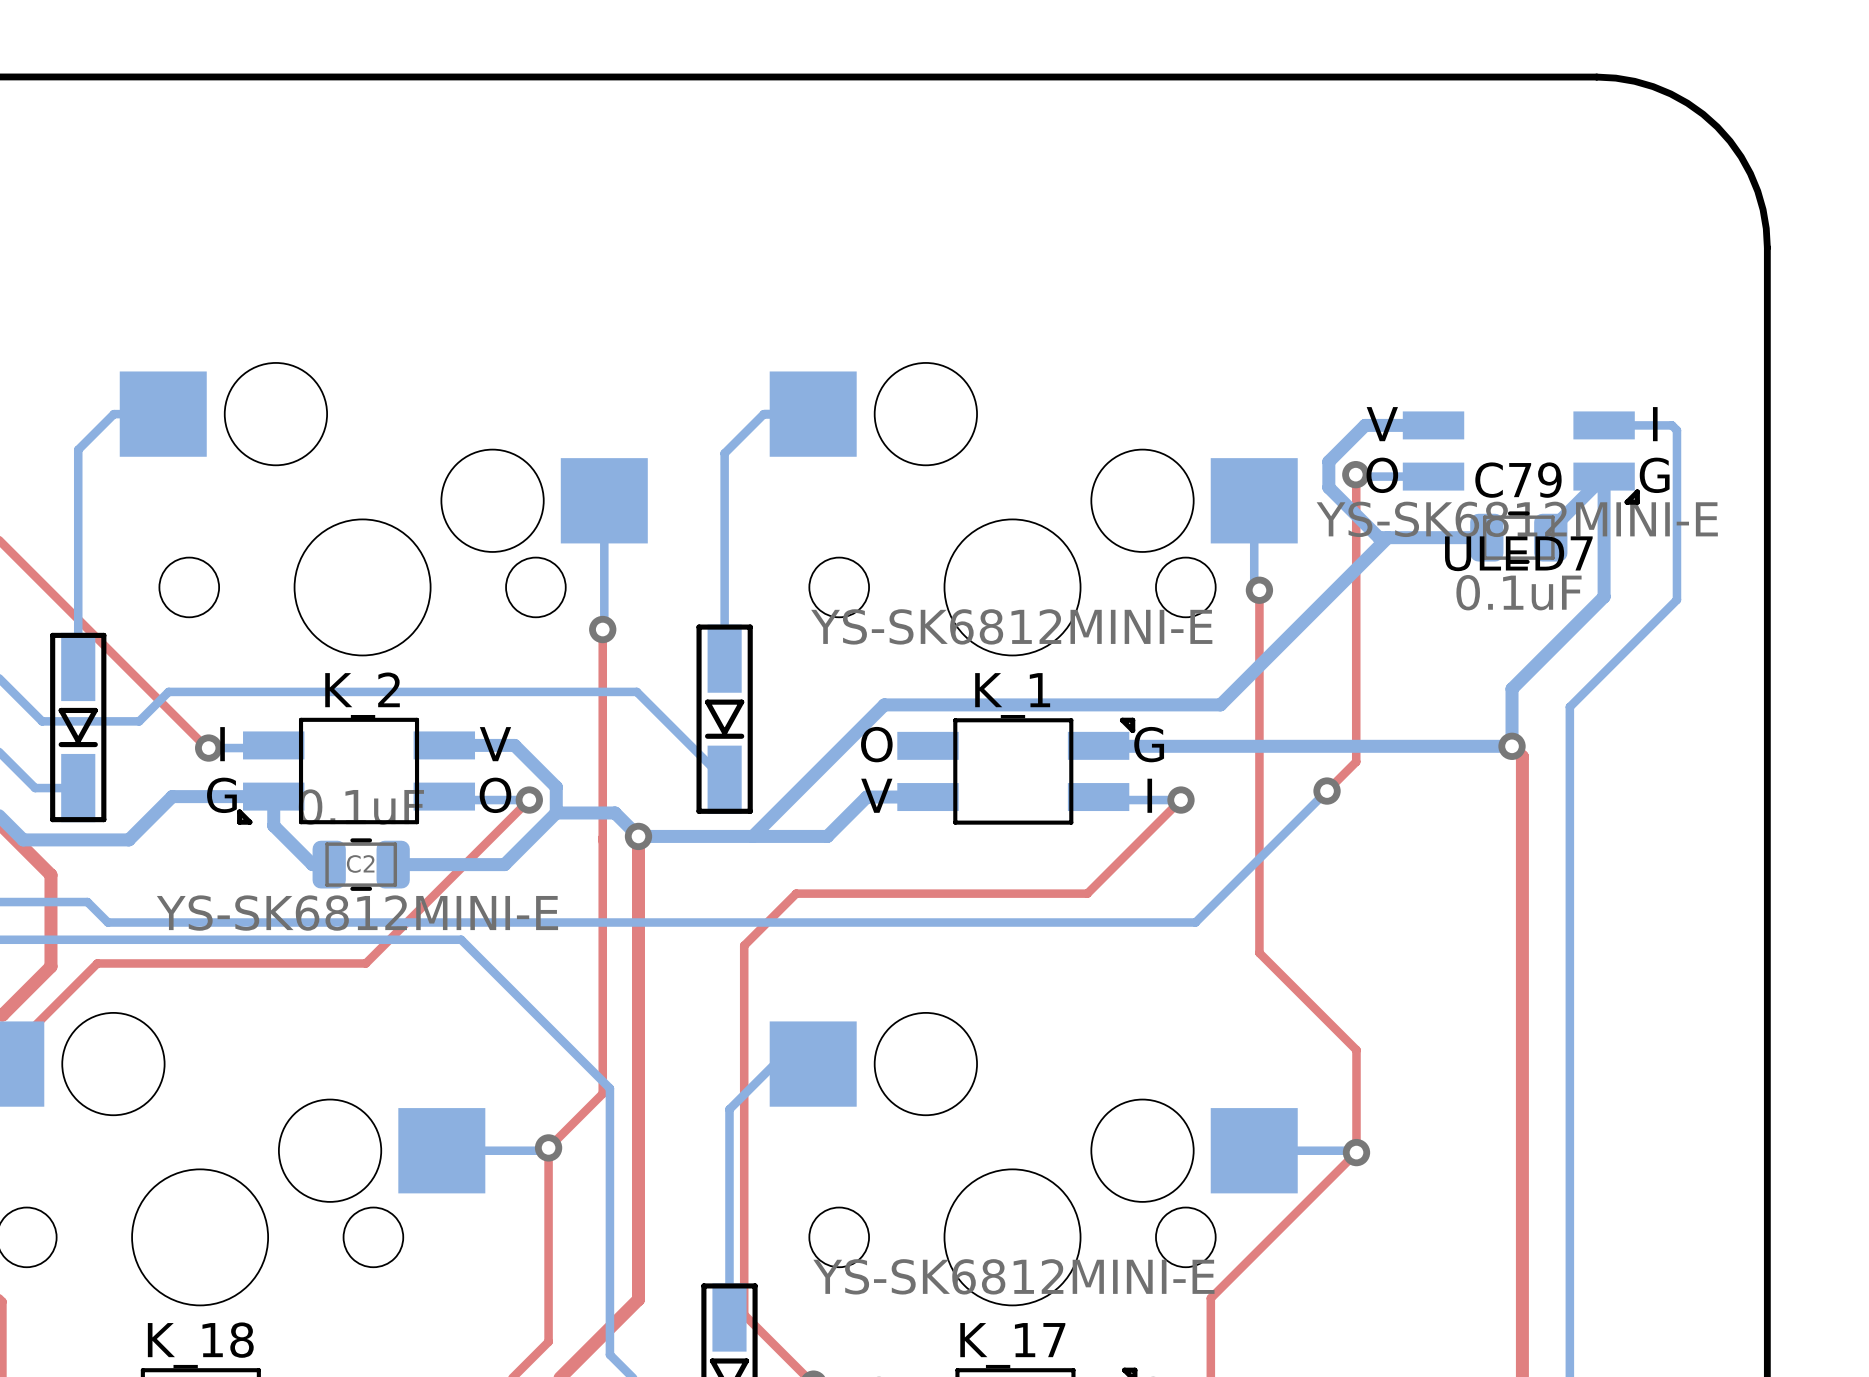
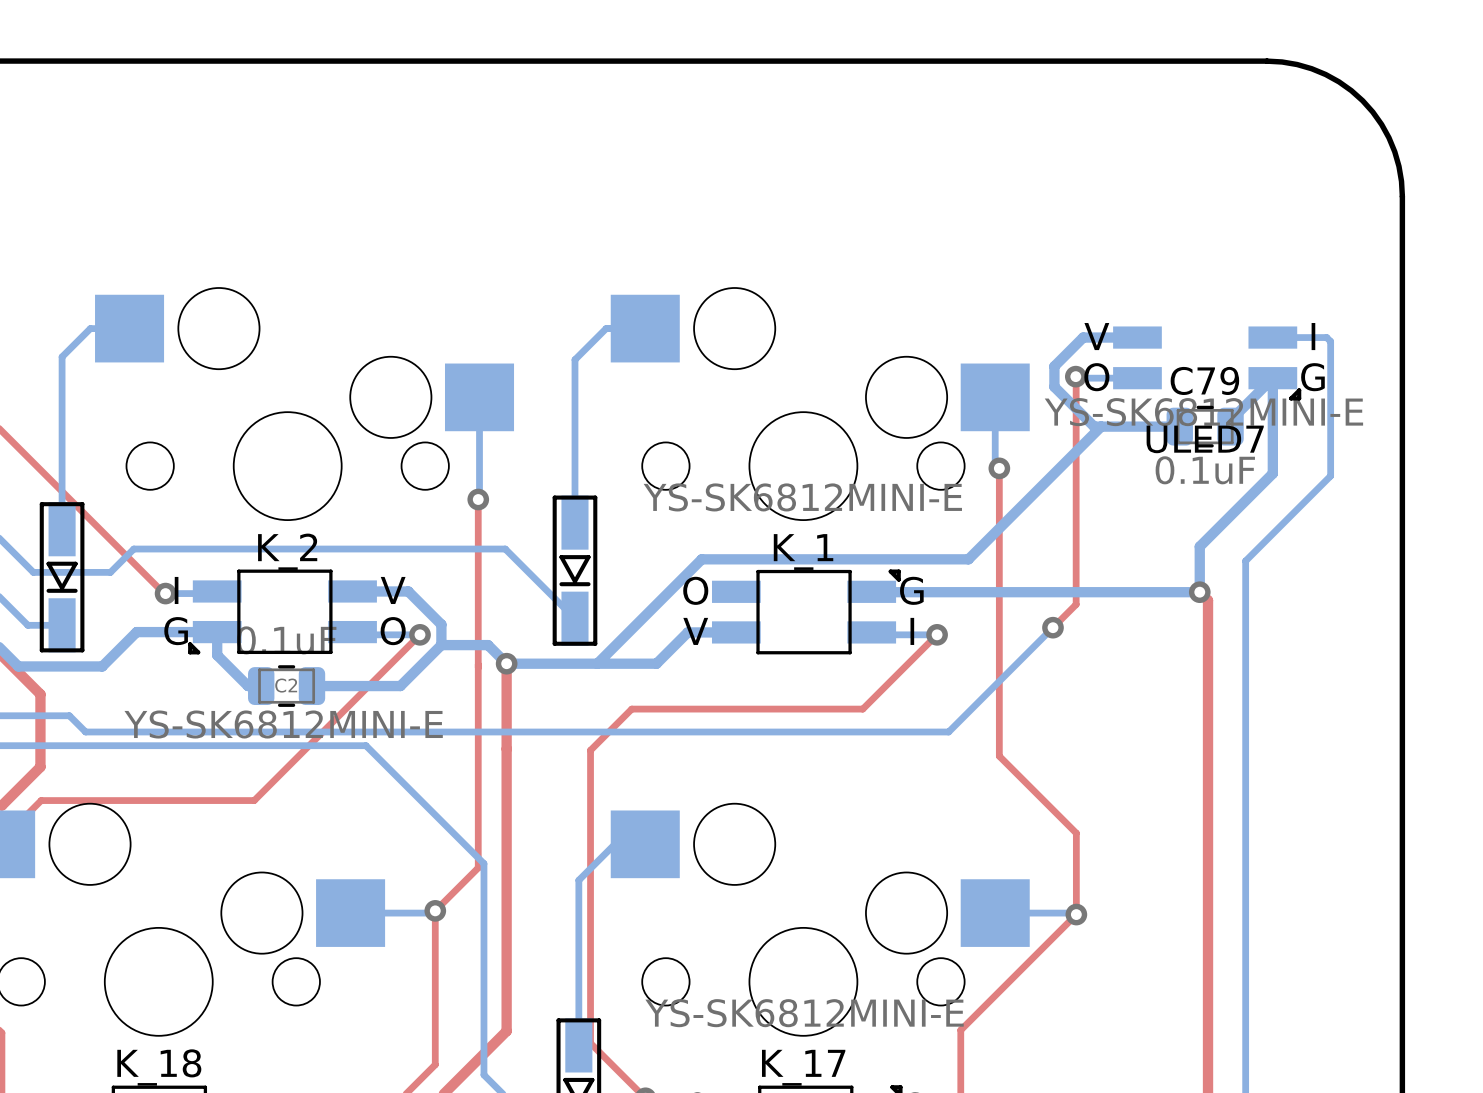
top track: (365, 963) (97, 963) (51, 1008) -> (290, 764) (254, 800) (41, 800)

